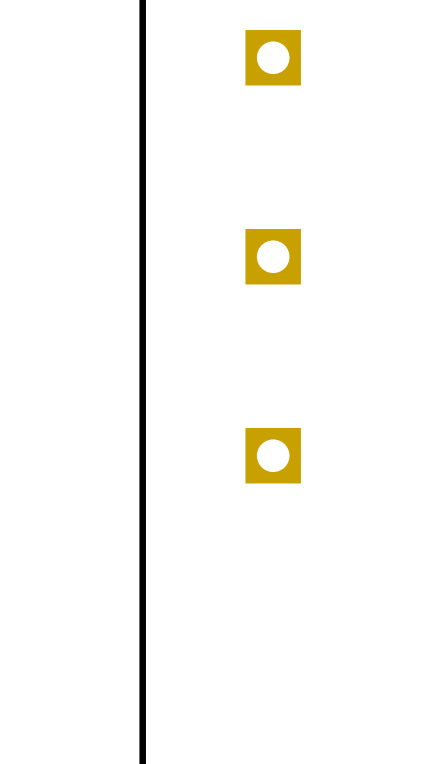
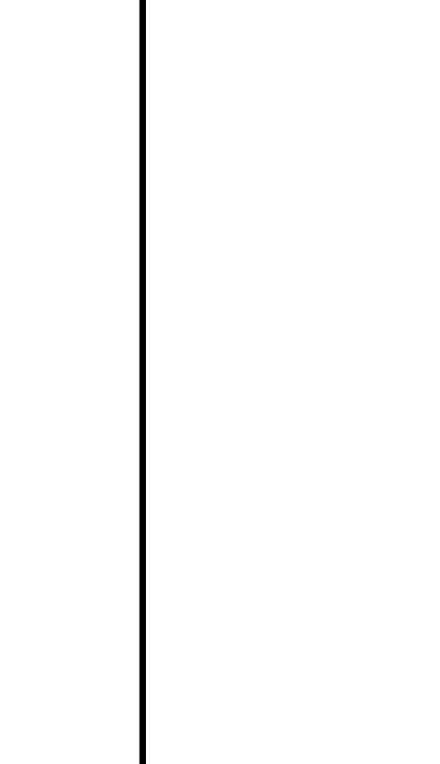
part: (273, 57) -> none
part: (273, 256) -> none
part: (273, 455) -> none

